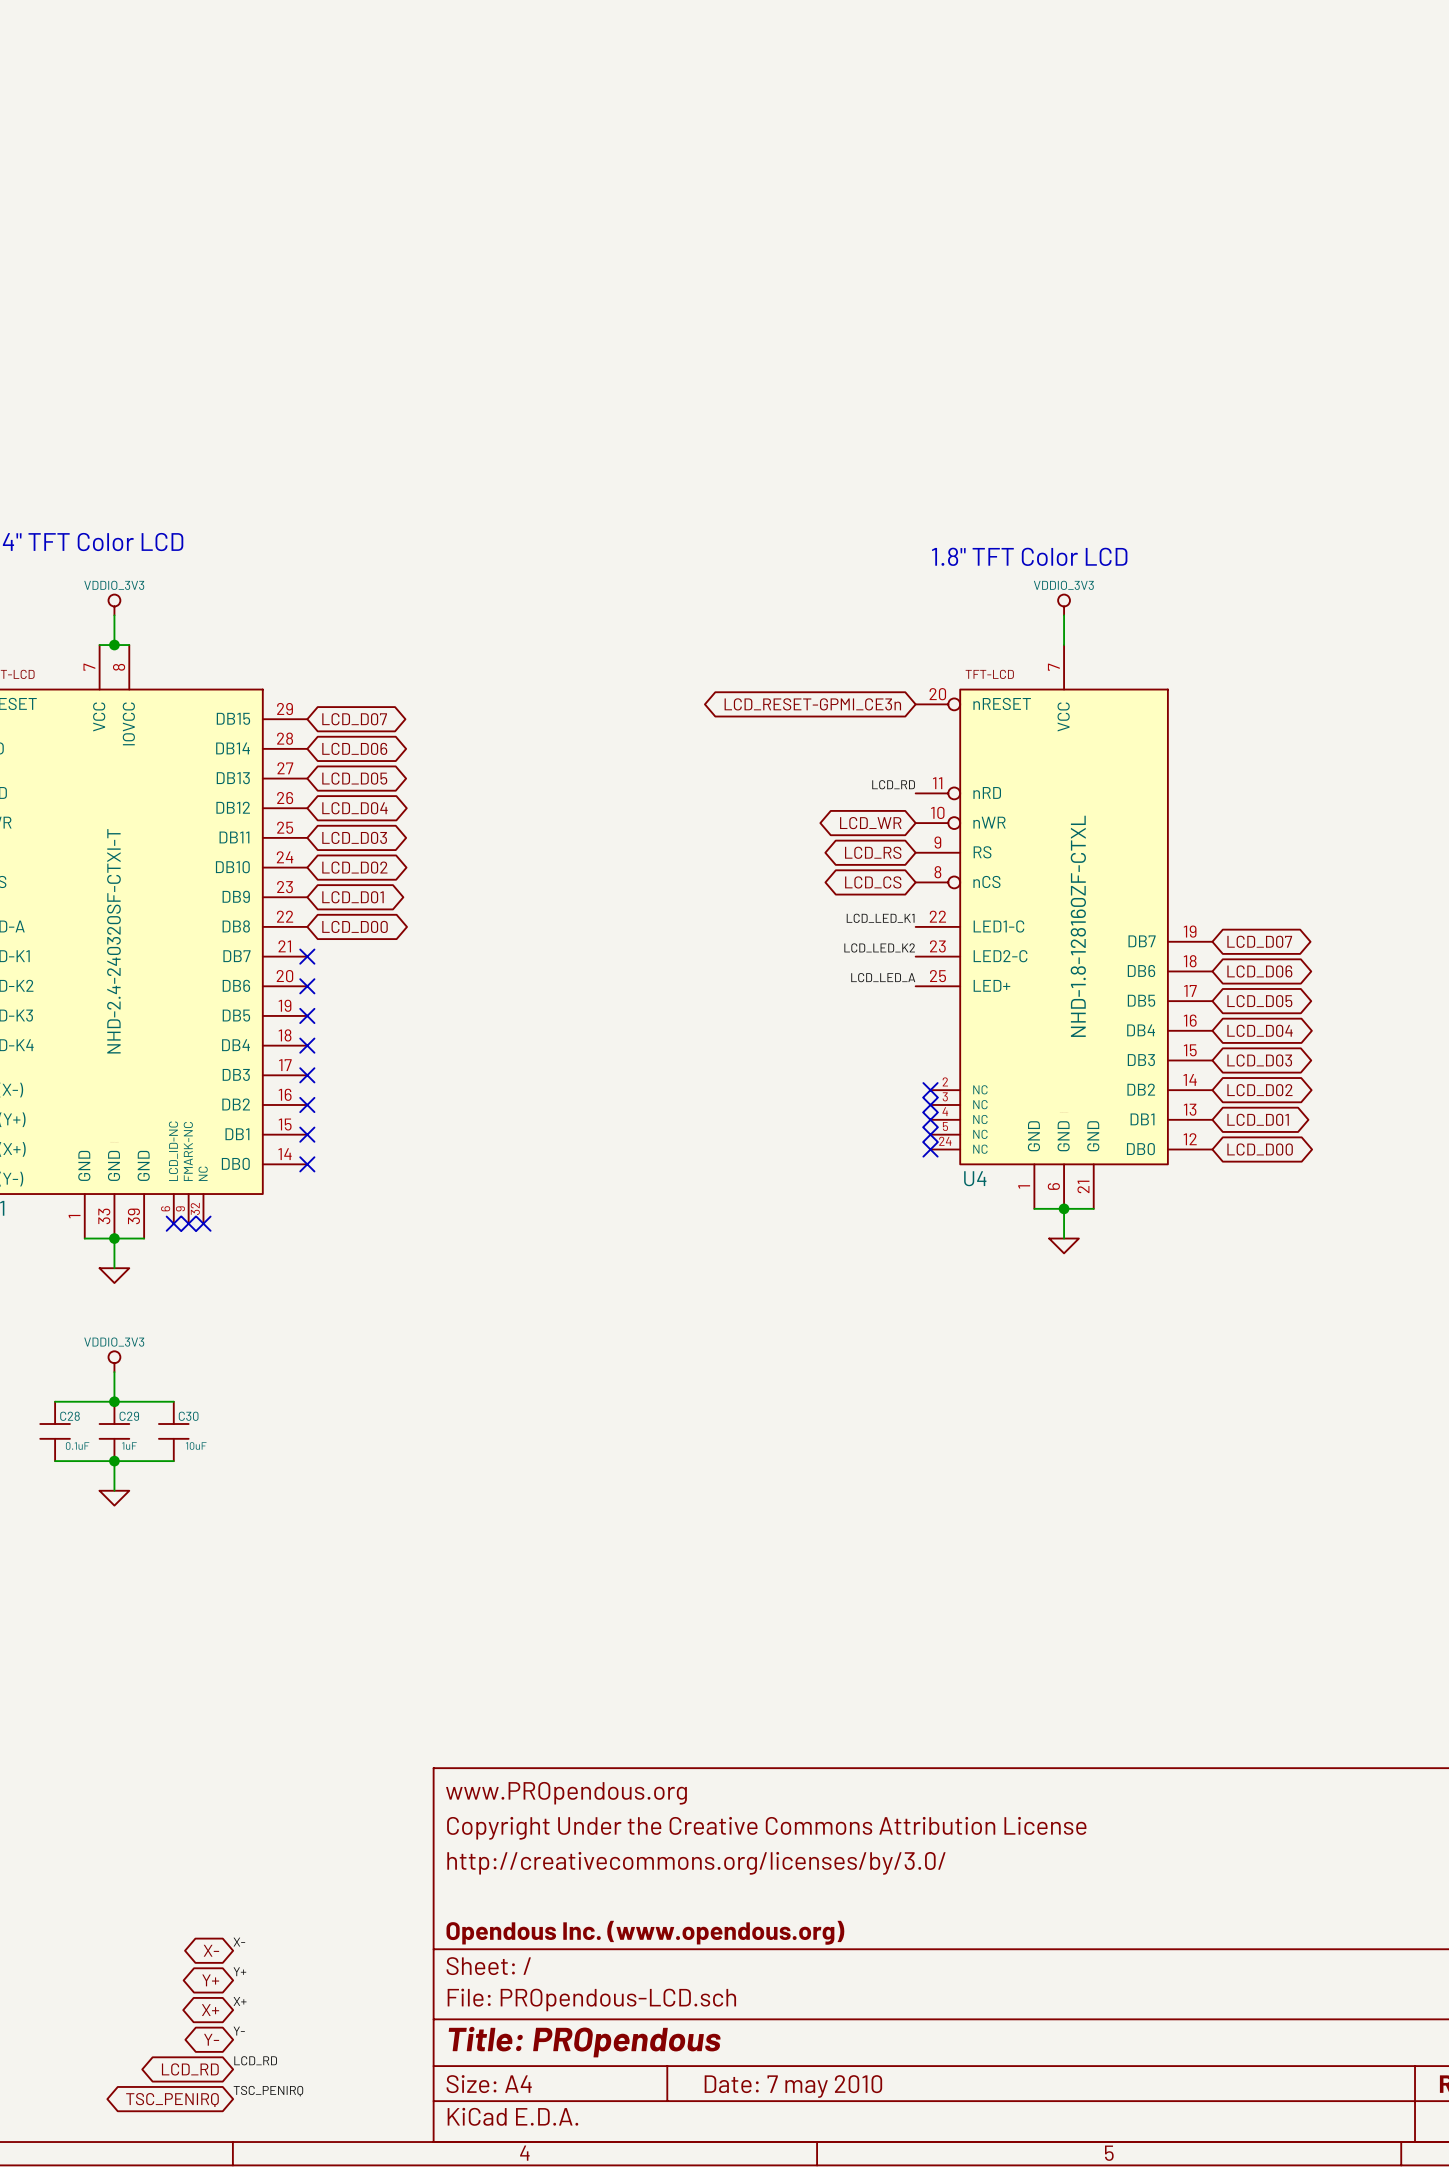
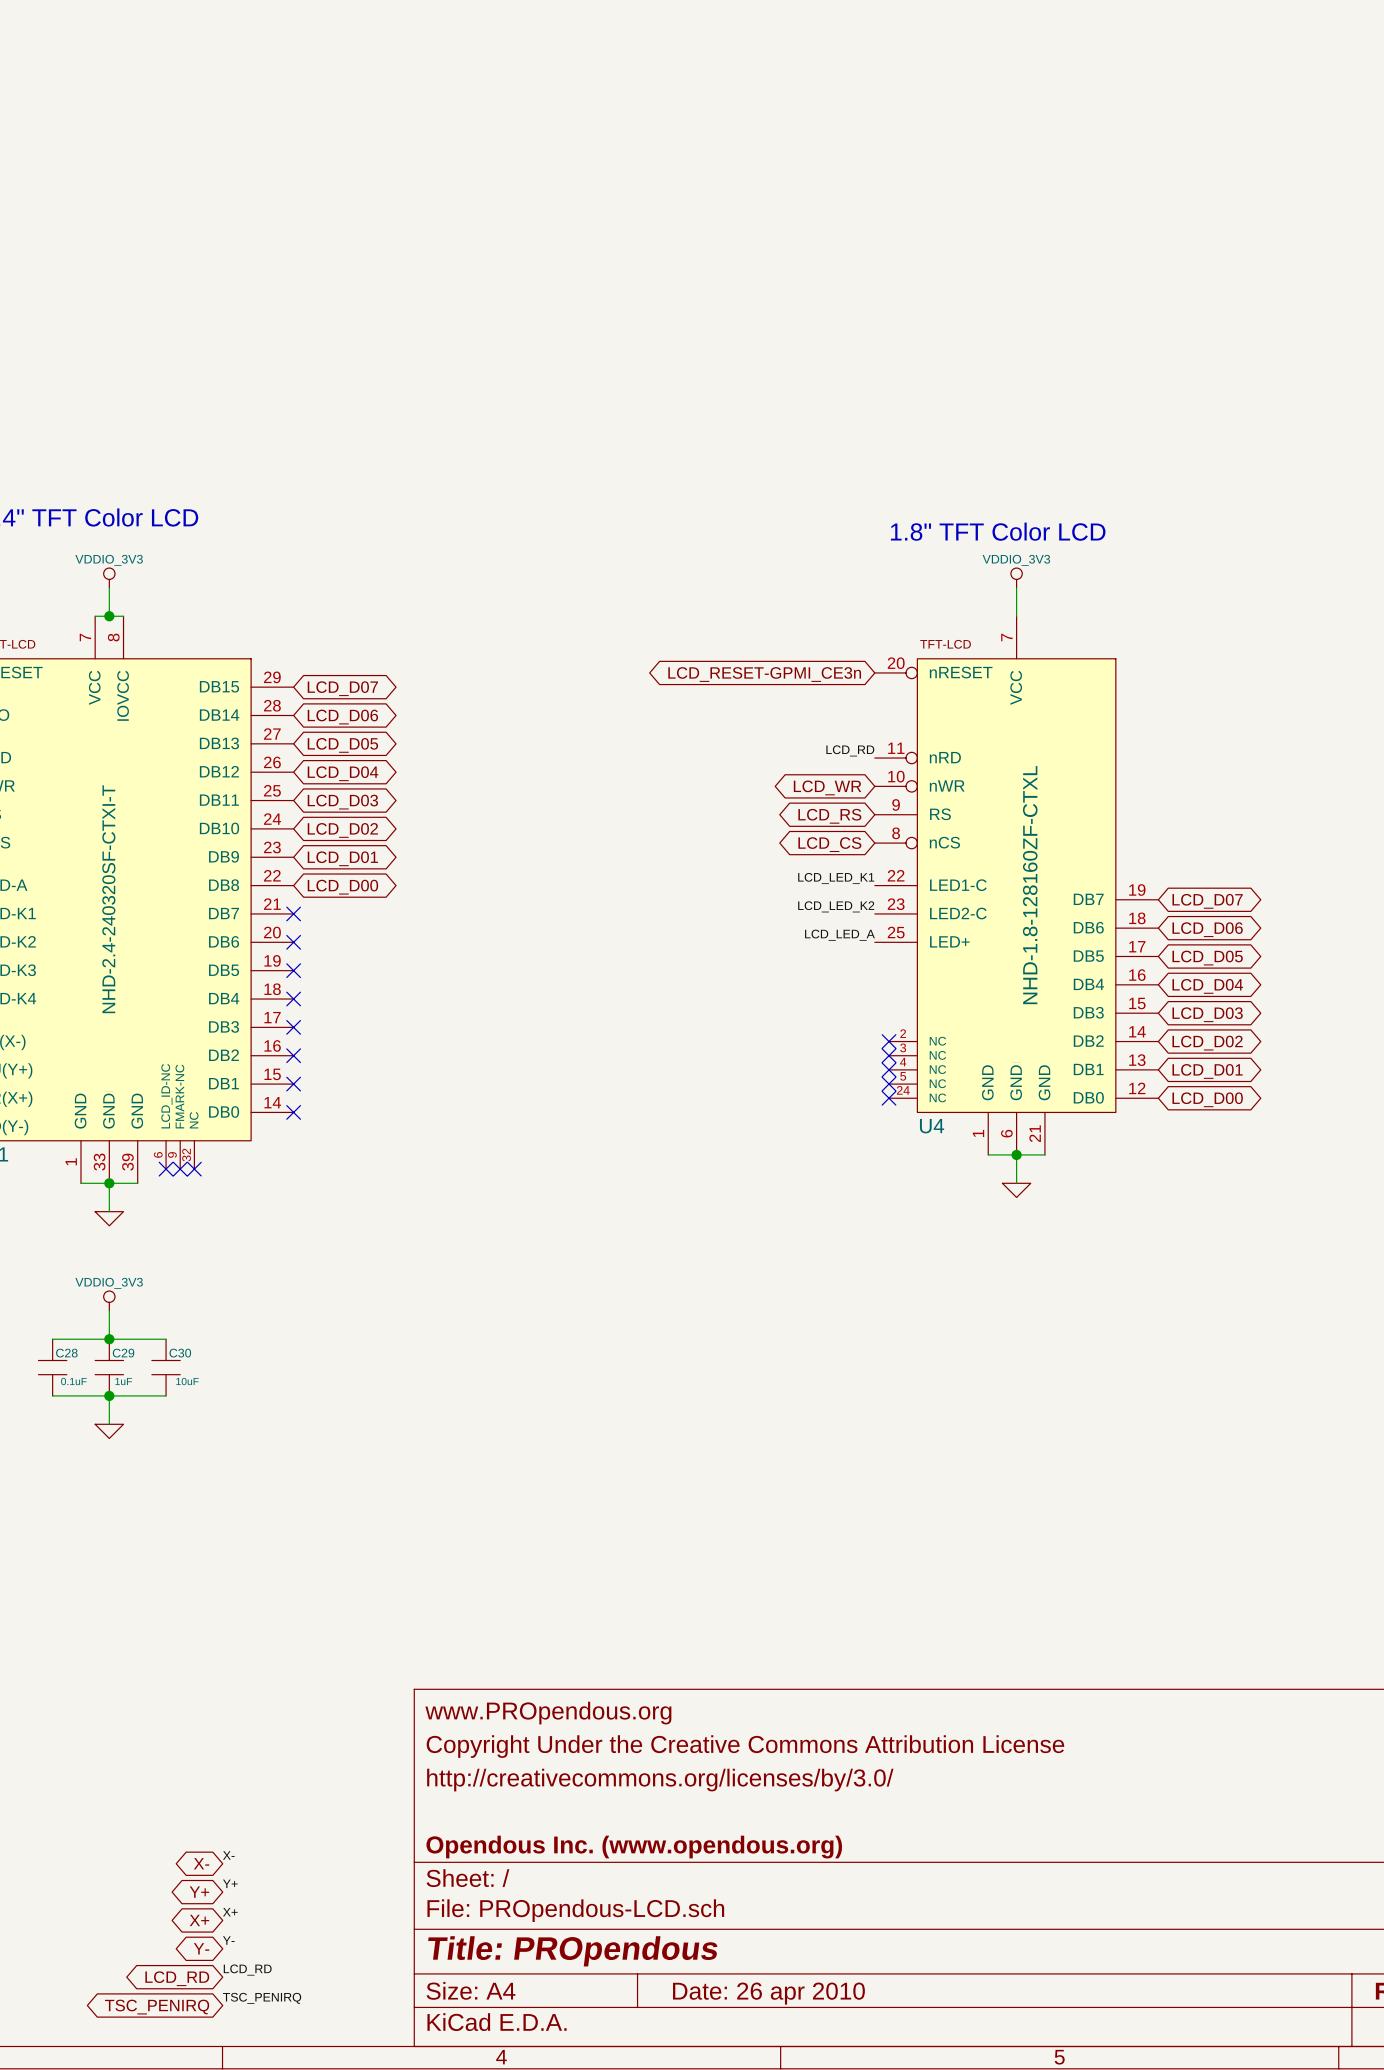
title block: Date: 7 may 2010 (793, 2086) -> Date: 26 apr 2010 (768, 1993)

